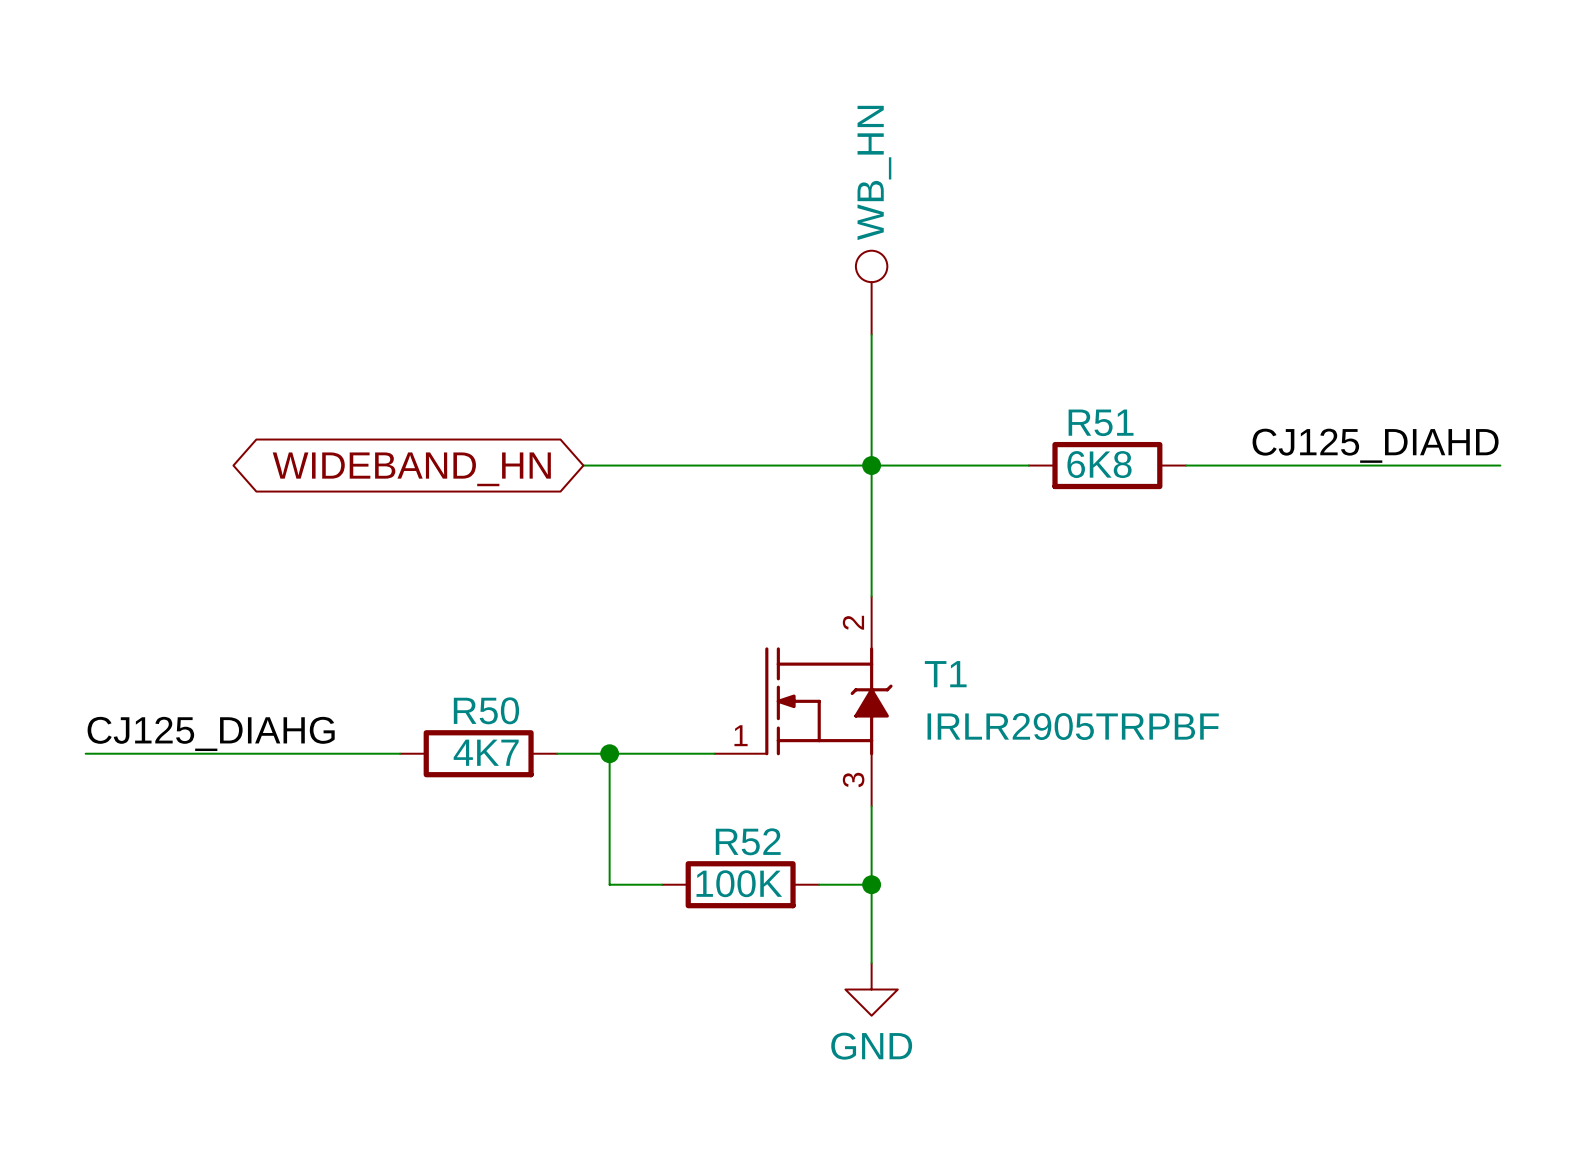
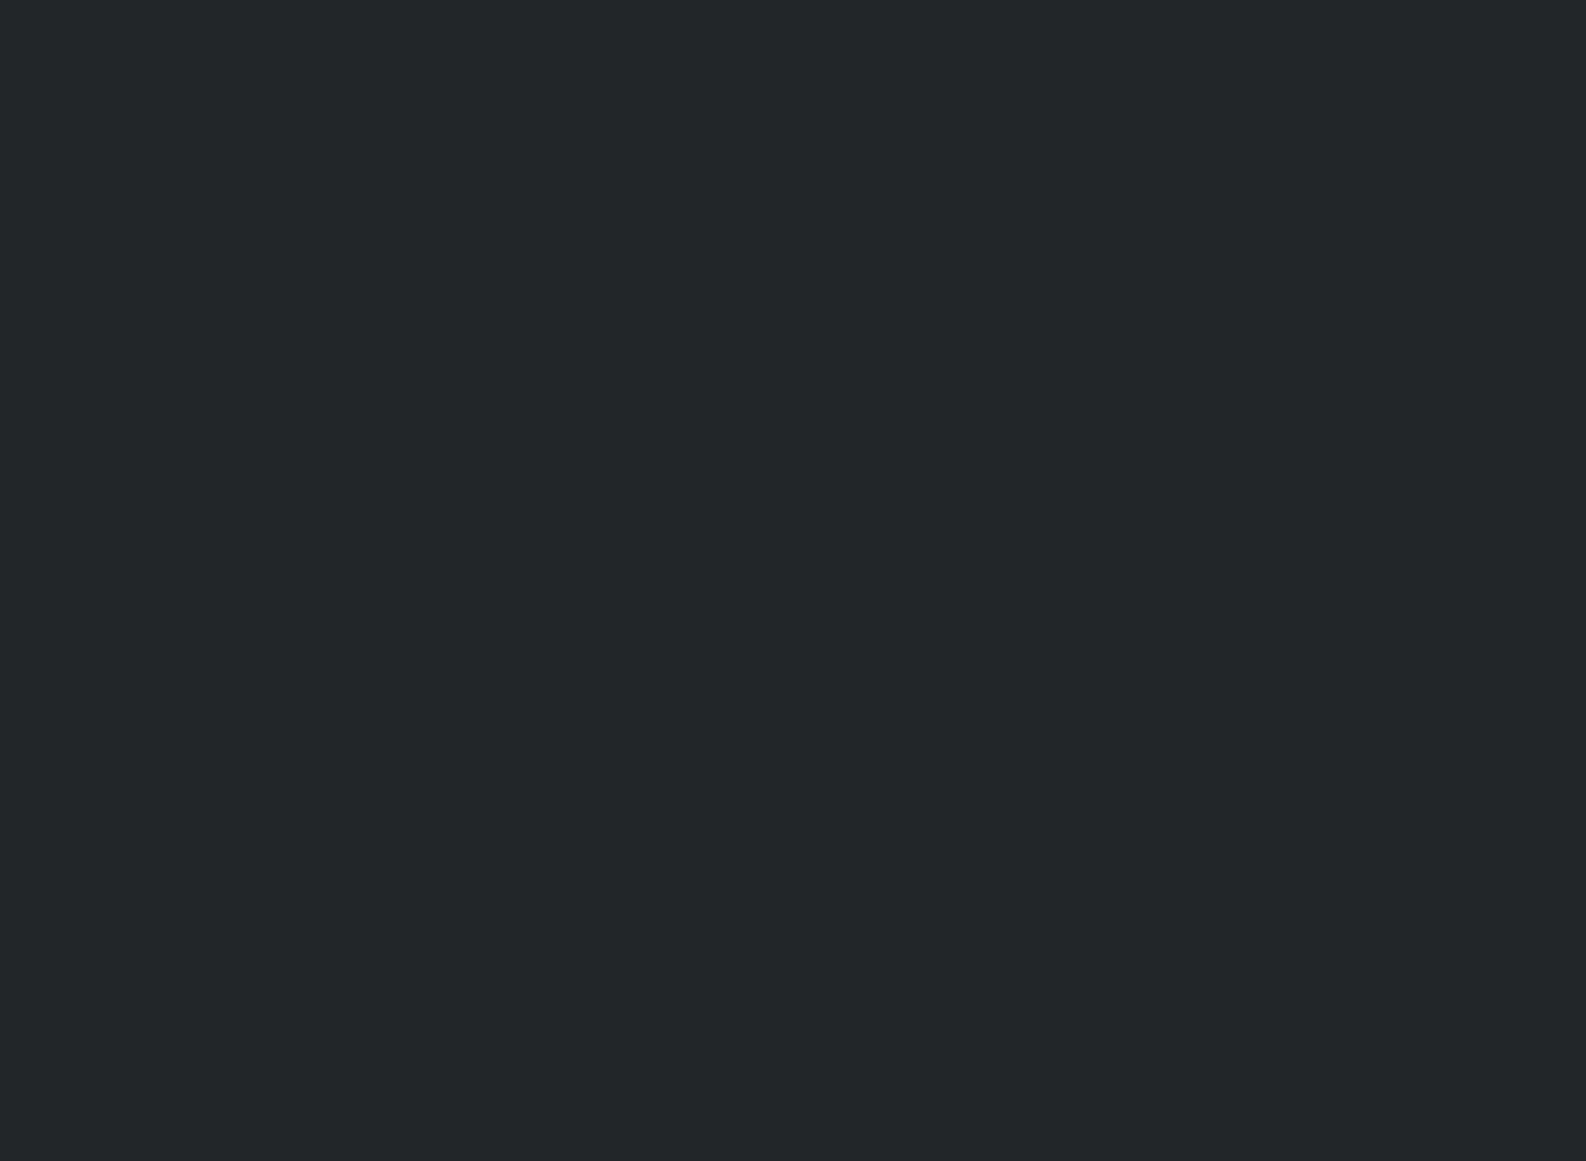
part: WB_HN (871, 292) -> none
wire: (871, 334) (871, 596) -> none
label: CJ125_DIAHD (1375, 445) -> none
wire: (583, 465) (1028, 465) -> none
junction: (871, 465) -> none
R51: 6K8 (1107, 465) -> none
wire: (1186, 465) (1500, 465) -> none
global label: WIDEBAND_HN (411, 469) -> none
T1: IRLR2905TRPBF (803, 701) -> none
label: CJ125_DIAHG (211, 733) -> none
wire: (85, 753) (400, 753) -> none
R50: 4K7 (478, 753) -> none
wire: (557, 753) (714, 753) -> none
wire: (609, 753) (609, 884) (662, 884) -> none
junction: (609, 753) -> none
wire: (871, 806) (871, 963) -> none
R52: 100K (740, 884) -> none
wire: (819, 884) (871, 884) -> none
junction: (871, 884) -> none
power symbol: GND (871, 989) -> none

